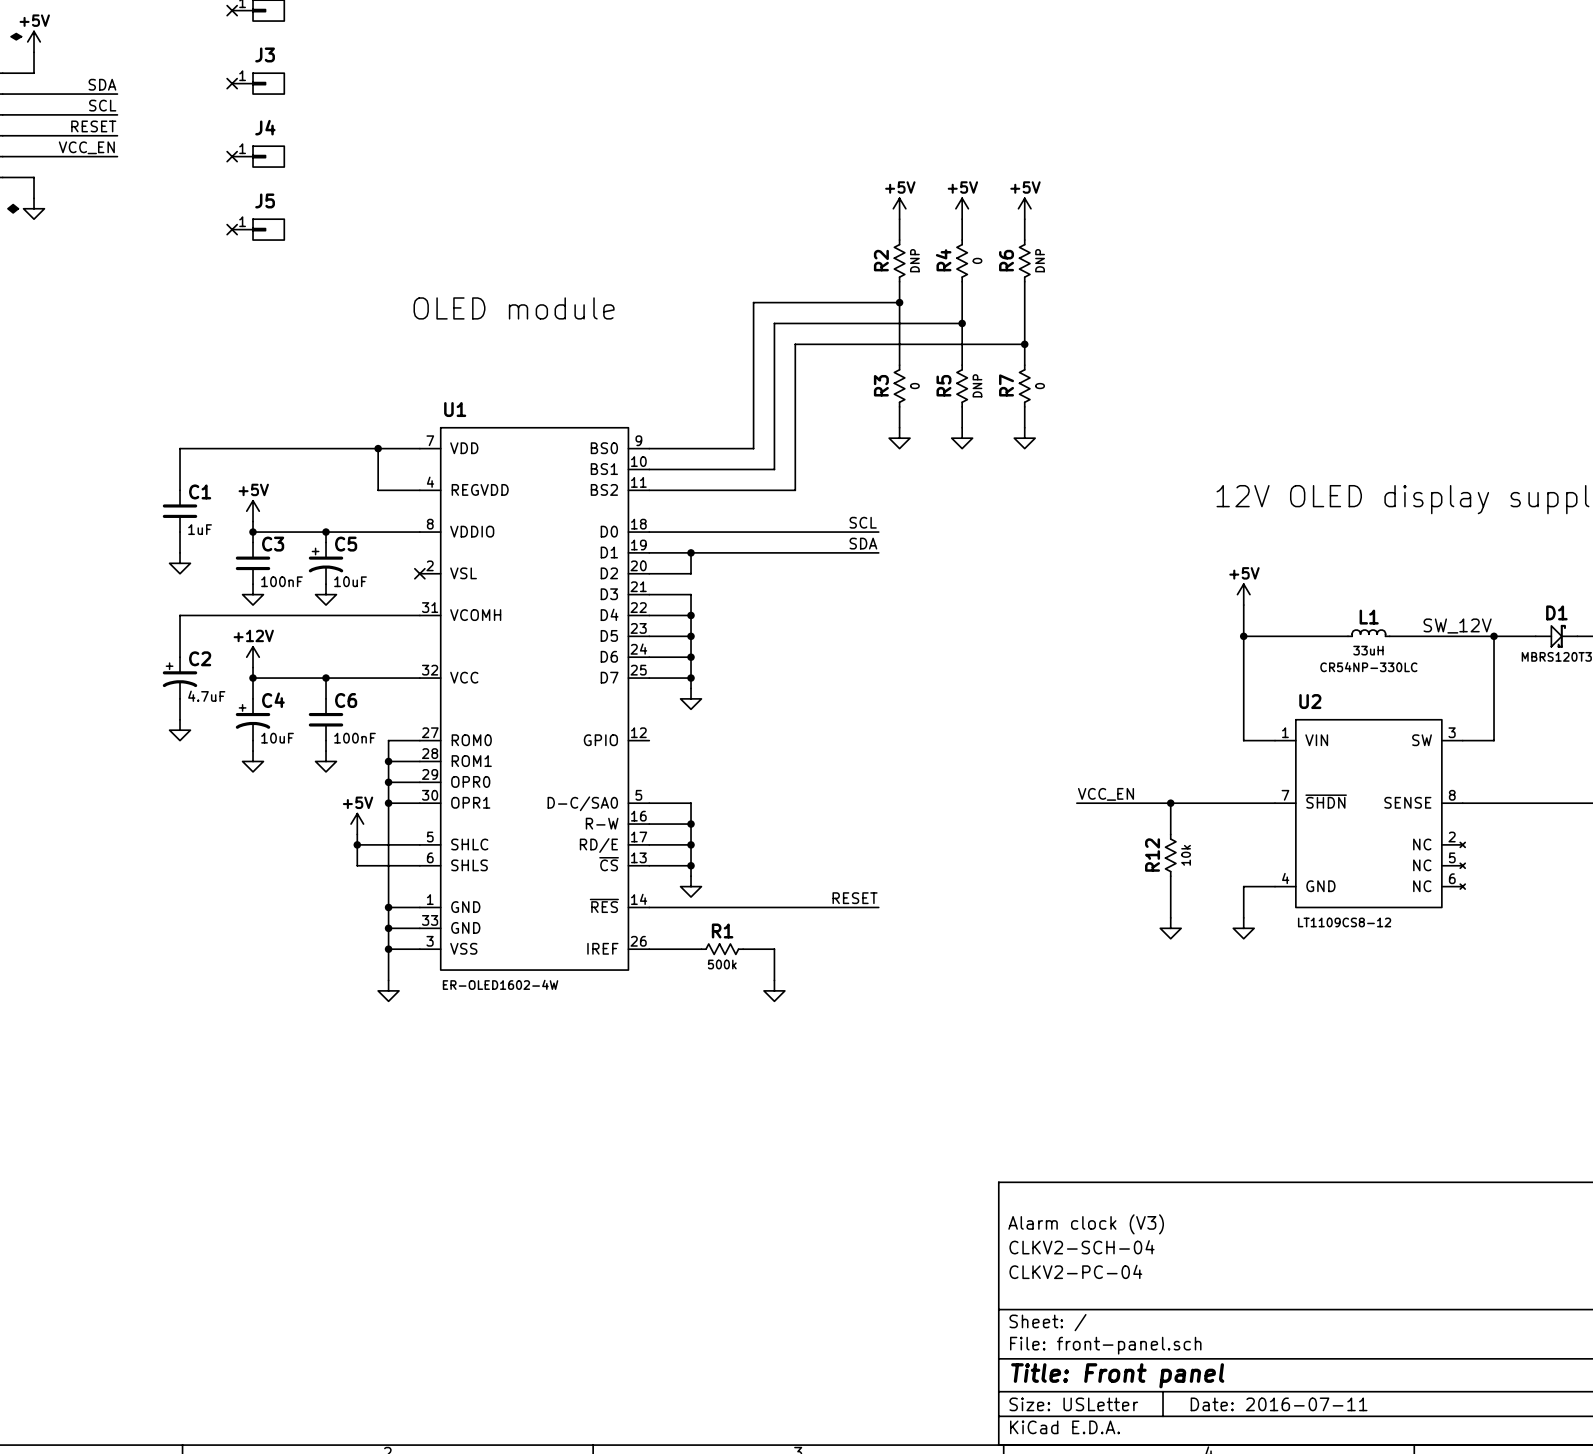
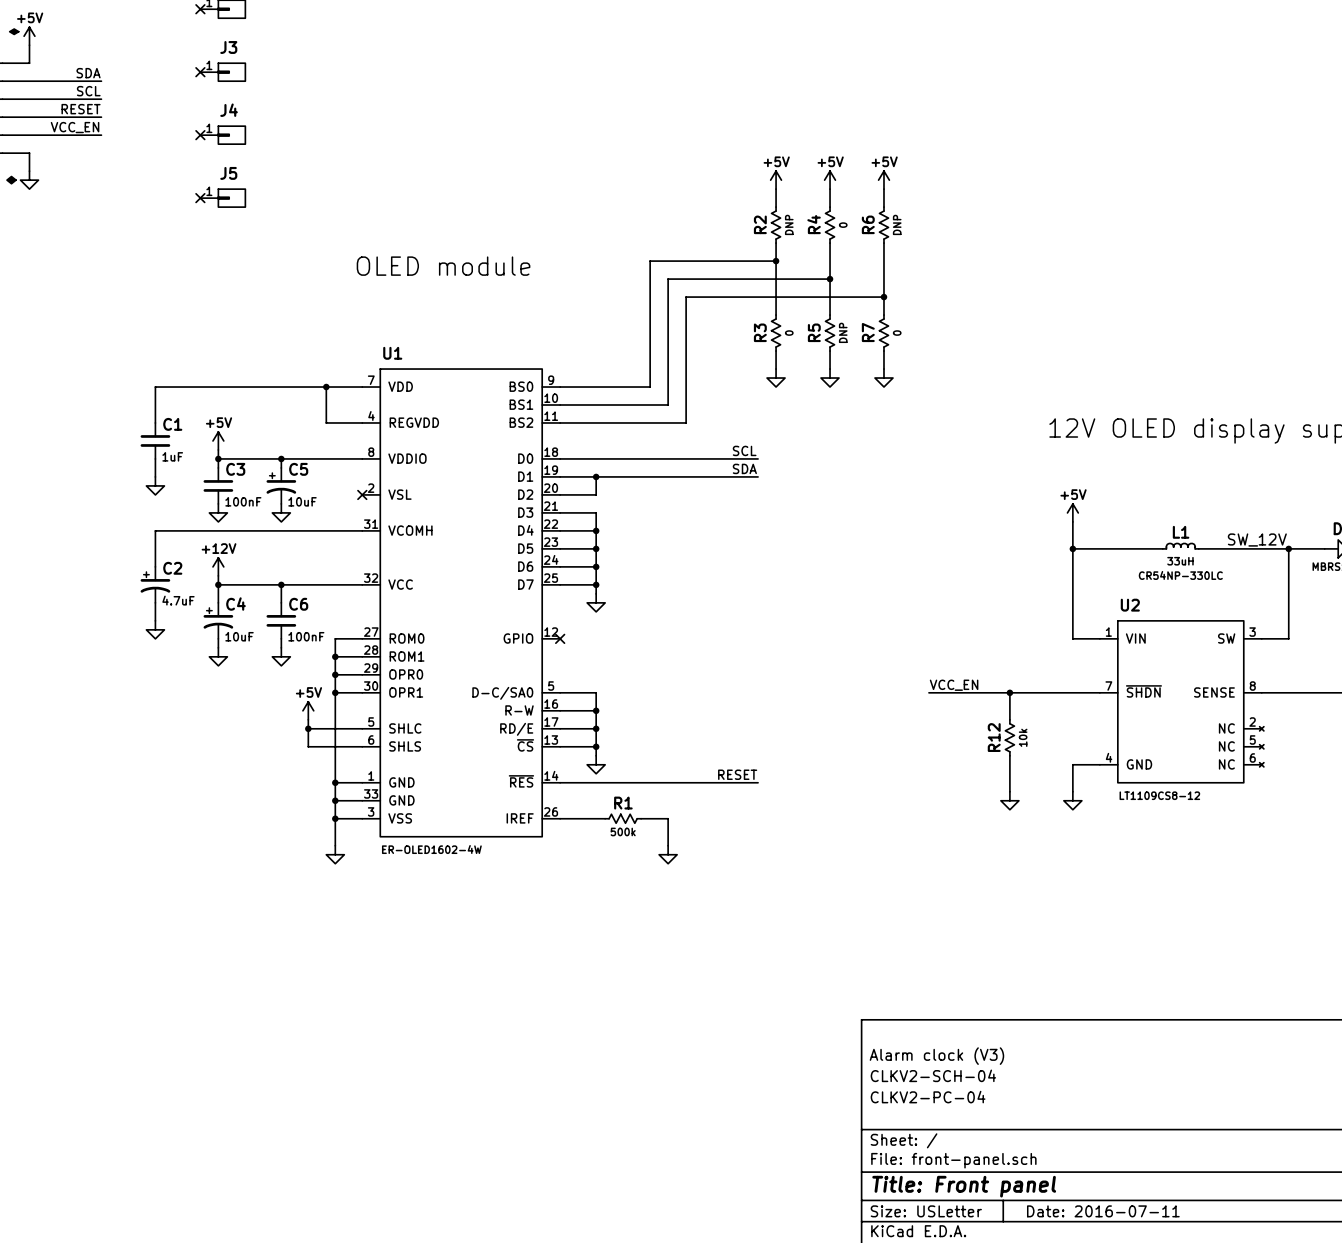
no-connect mark: none -> (560, 638)

